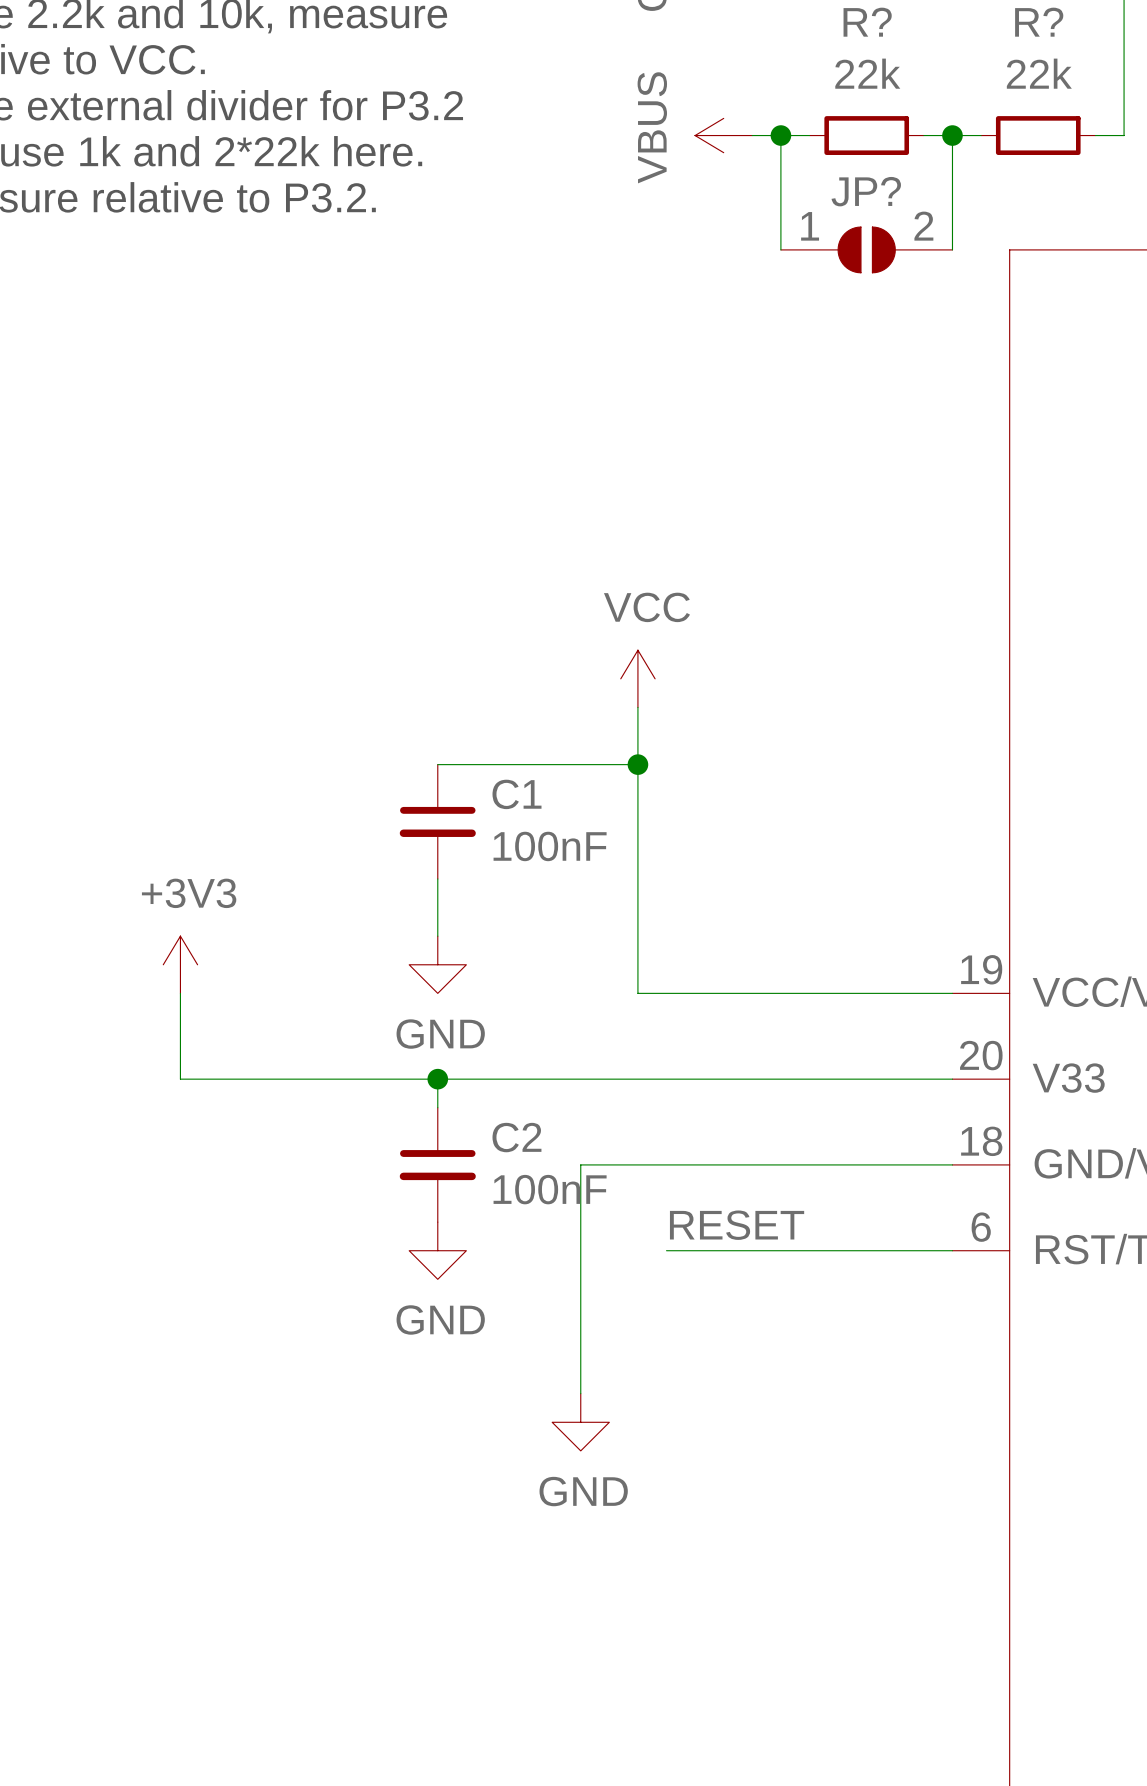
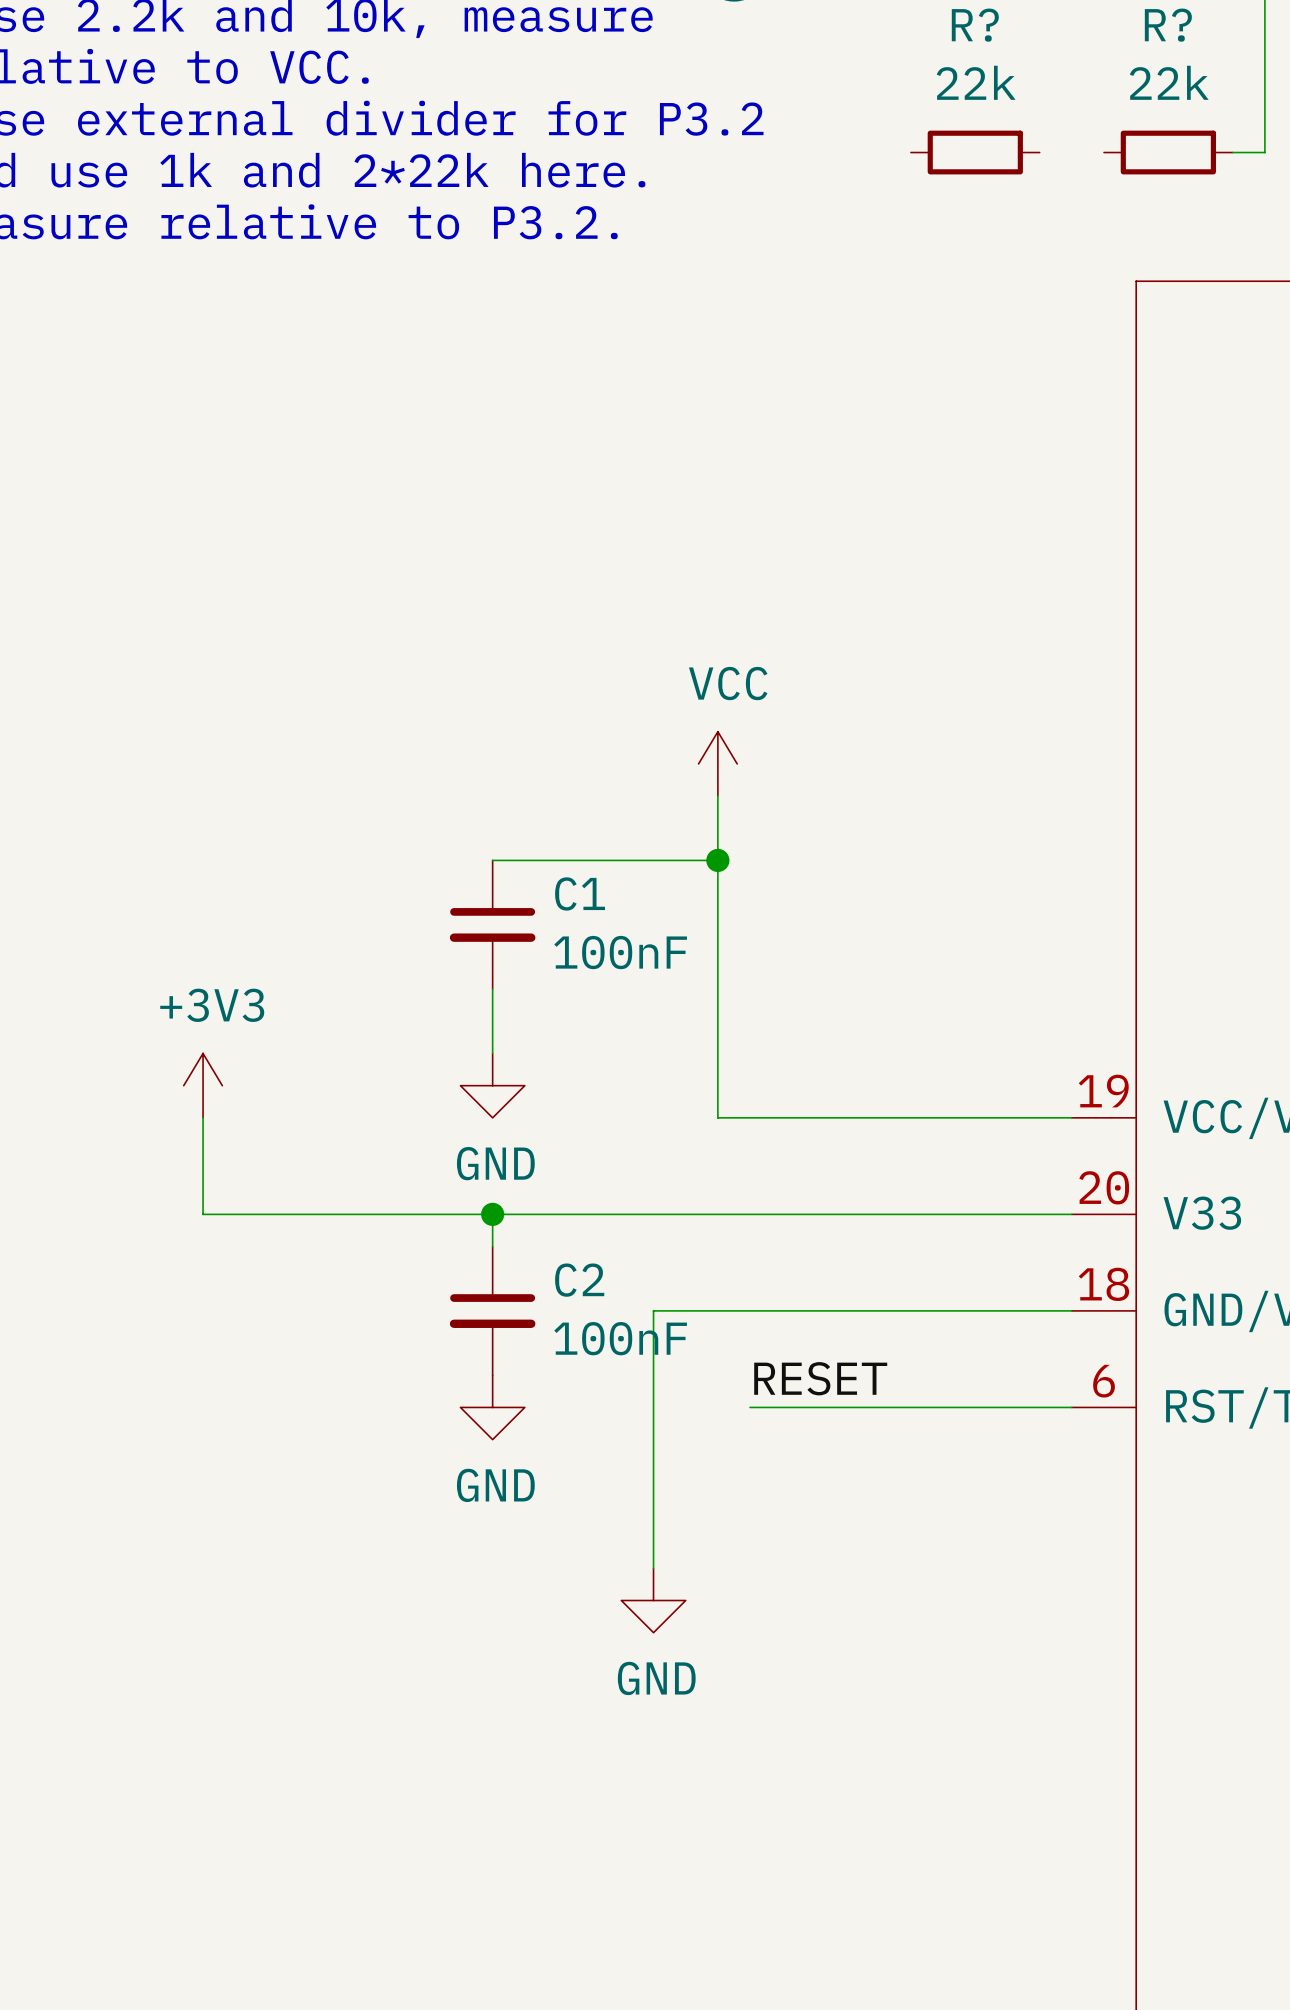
power symbol: VBUS (723, 135) -> none
wire: (752, 135) (809, 135) -> none
wire: (780, 135) (780, 249) -> none
junction: (780, 135) -> none
wire: (923, 135) (981, 135) -> none
wire: (952, 135) (952, 249) -> none
junction: (952, 135) -> none
JP?: (866, 249) -> none

